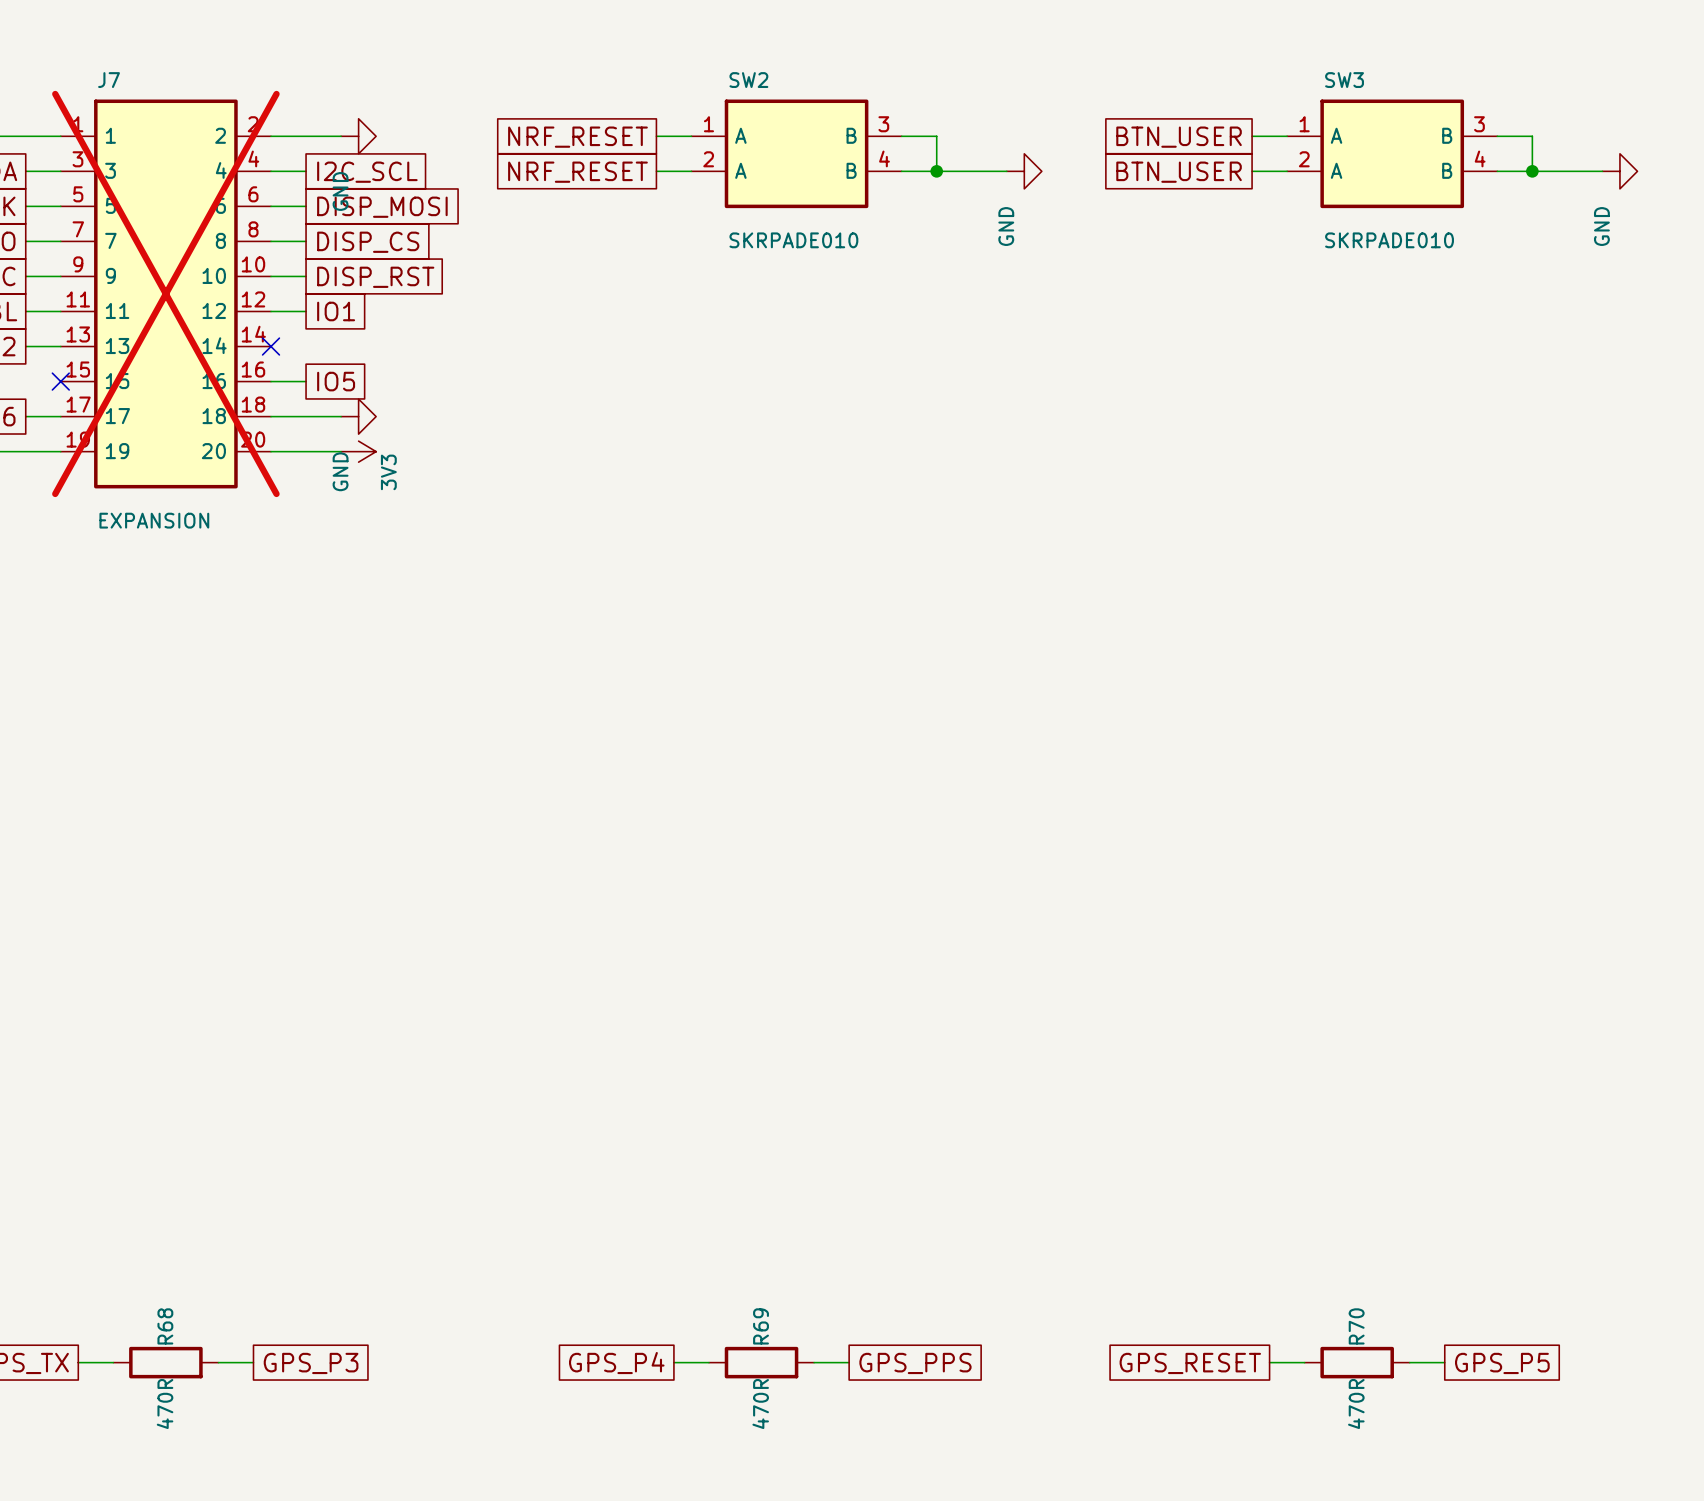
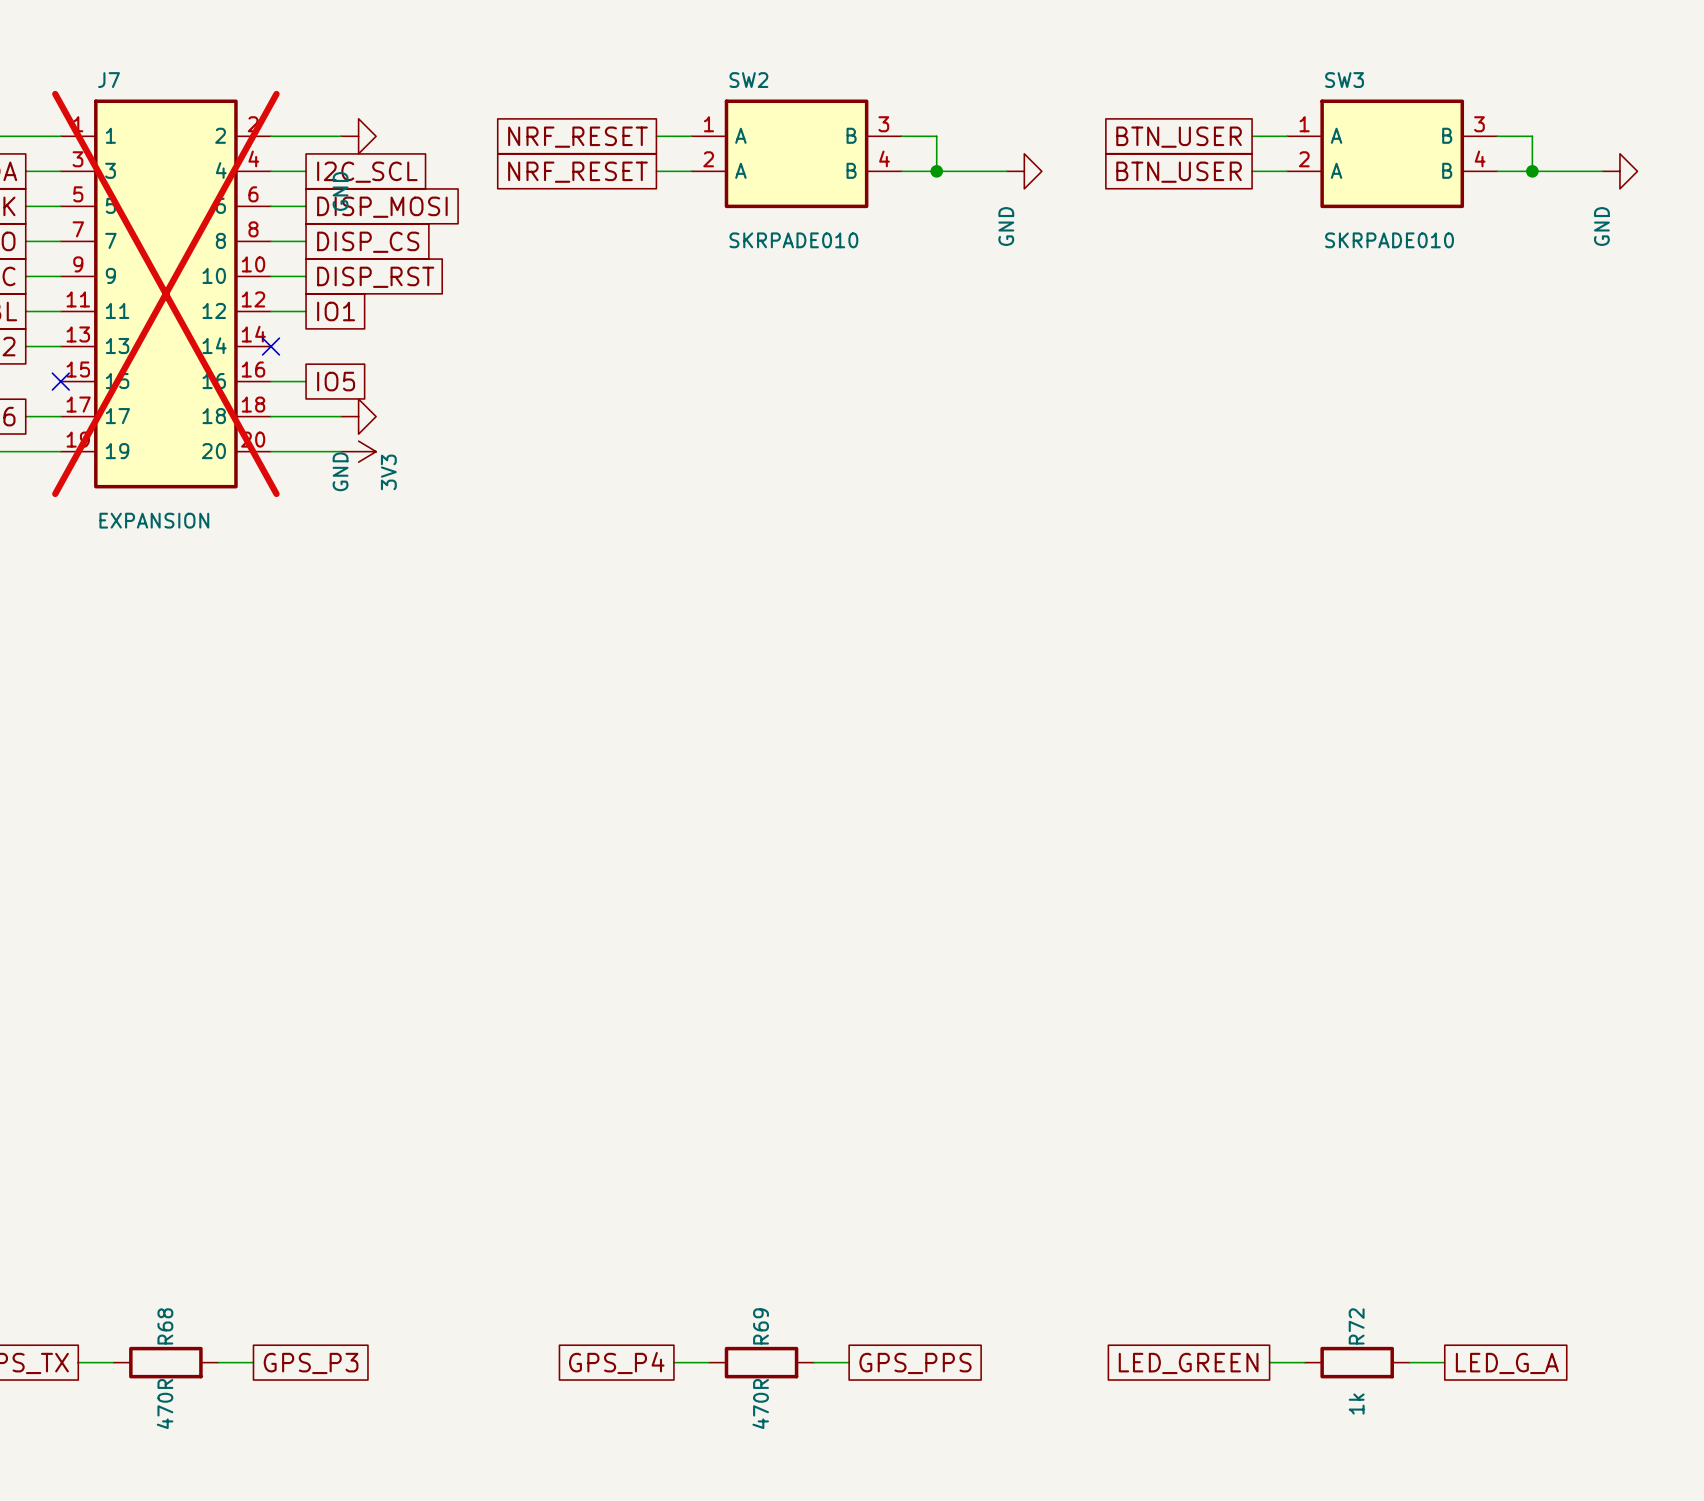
R70 name: R70 (1356, 1326) -> R72 (1356, 1326)
global label: GPS_RESET (1190, 1363) -> LED_GREEN (1188, 1363)
global label: GPS_P5 (1502, 1363) -> LED_G_A (1507, 1363)
R70 value: 470R (1356, 1404) -> 1k (1356, 1404)

